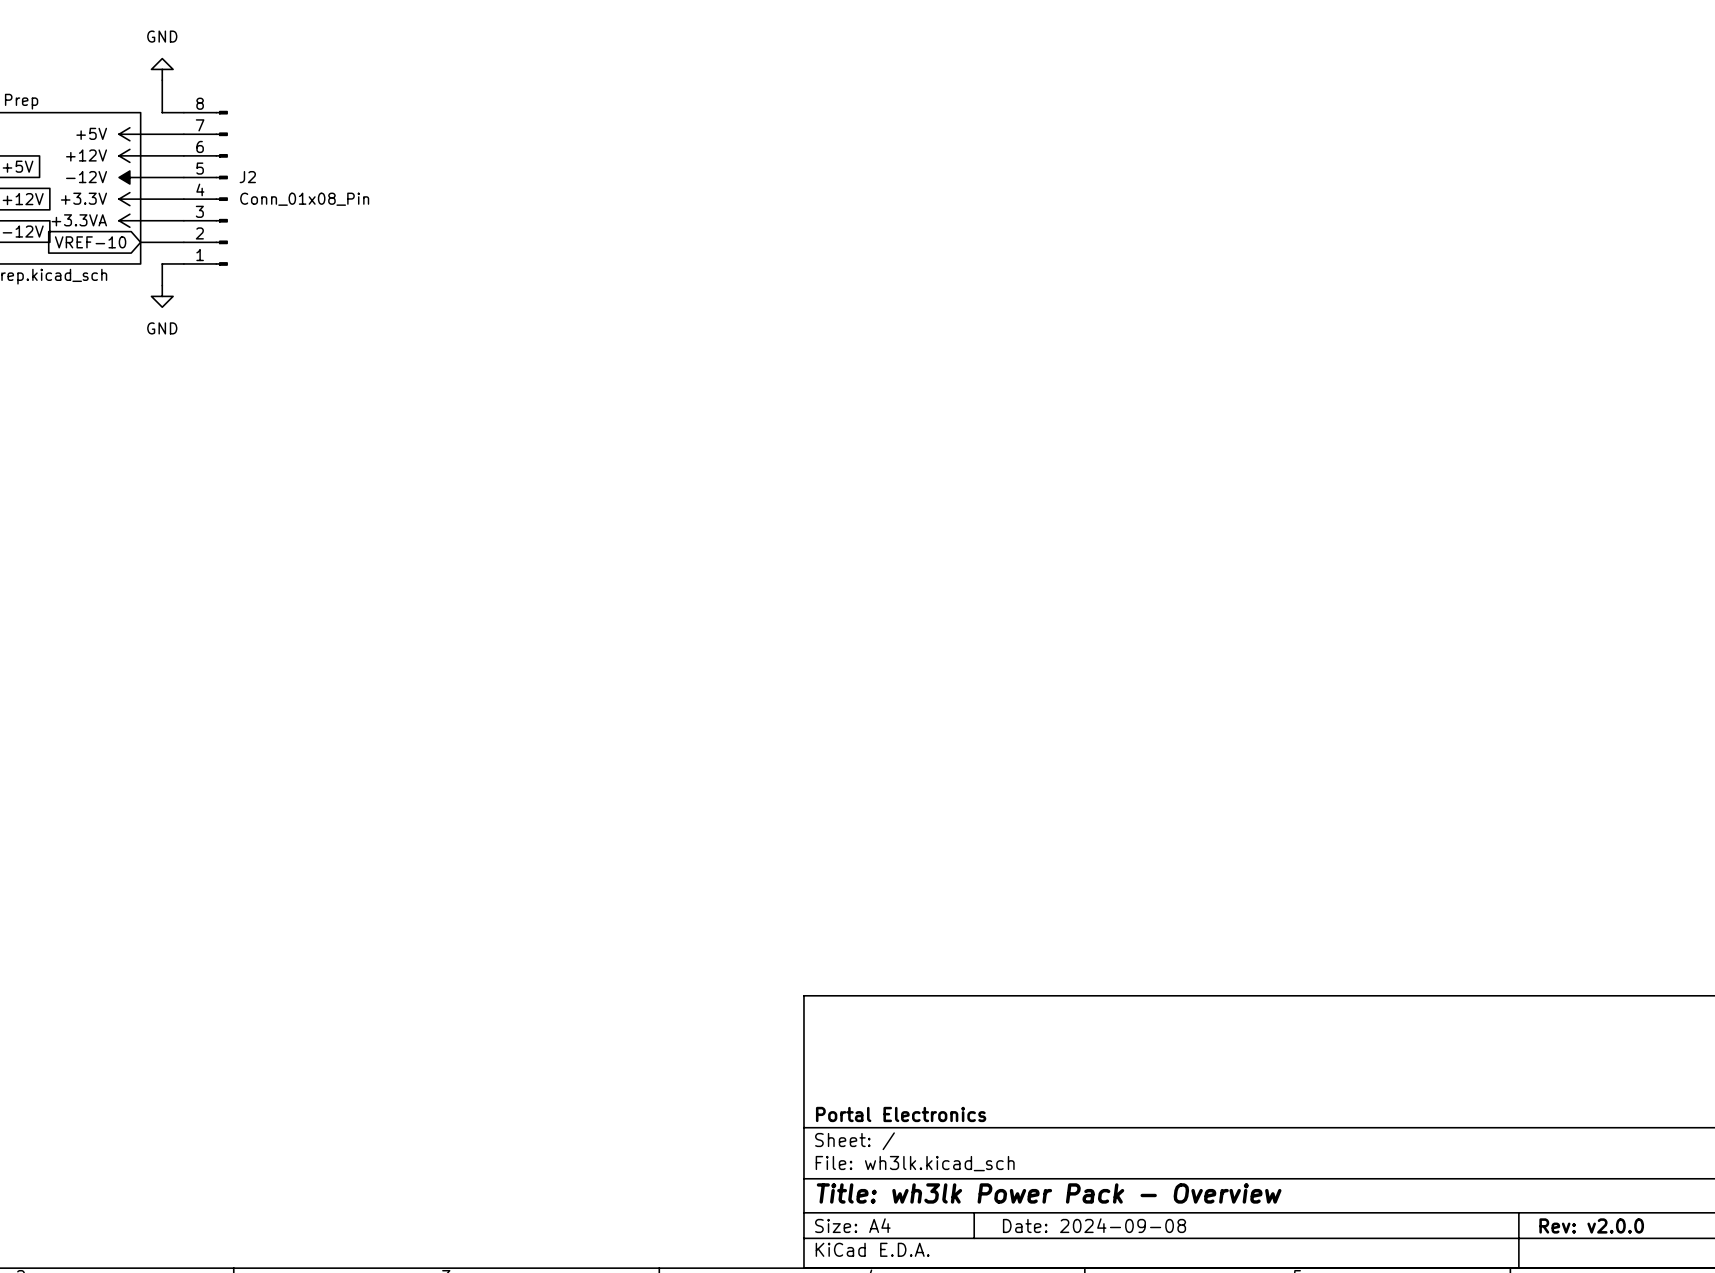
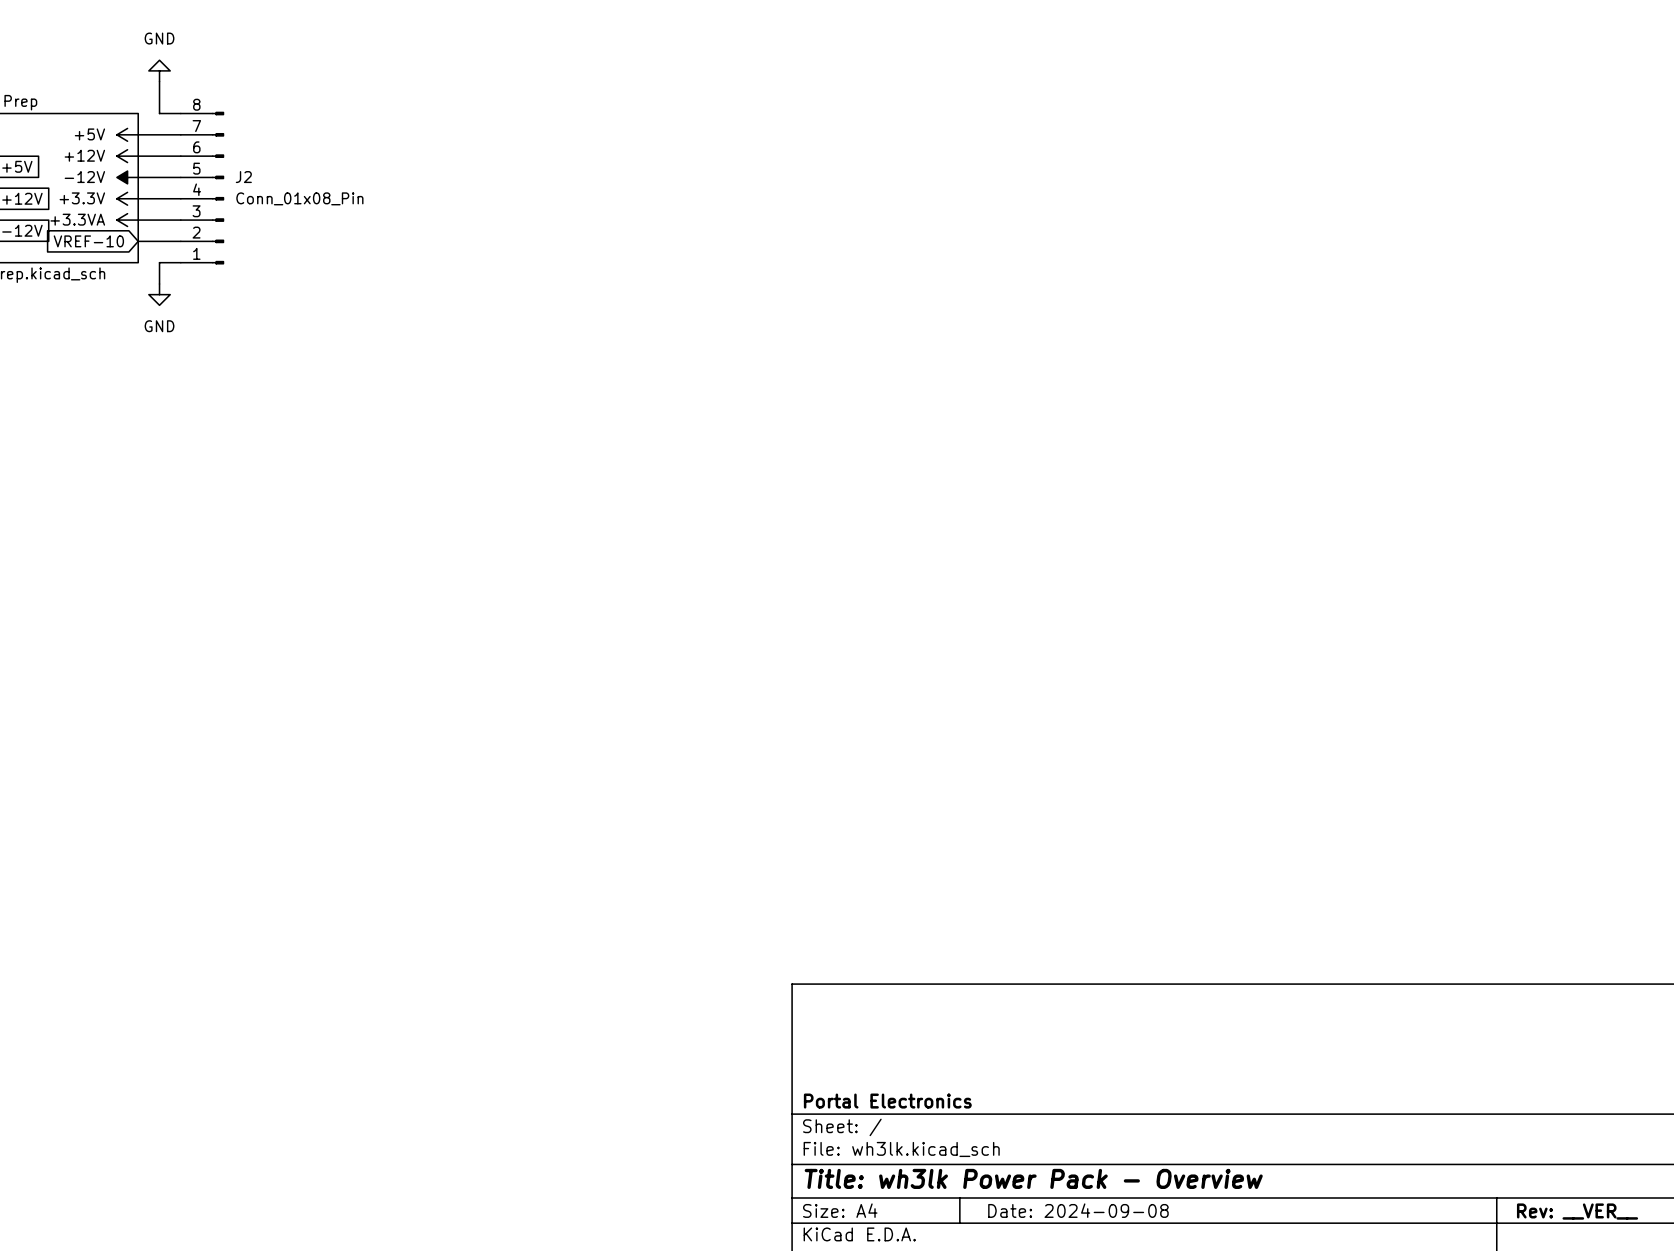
title block: Rev: v2.0.0 (1591, 1225) -> Rev: __VER__ (1577, 1211)

